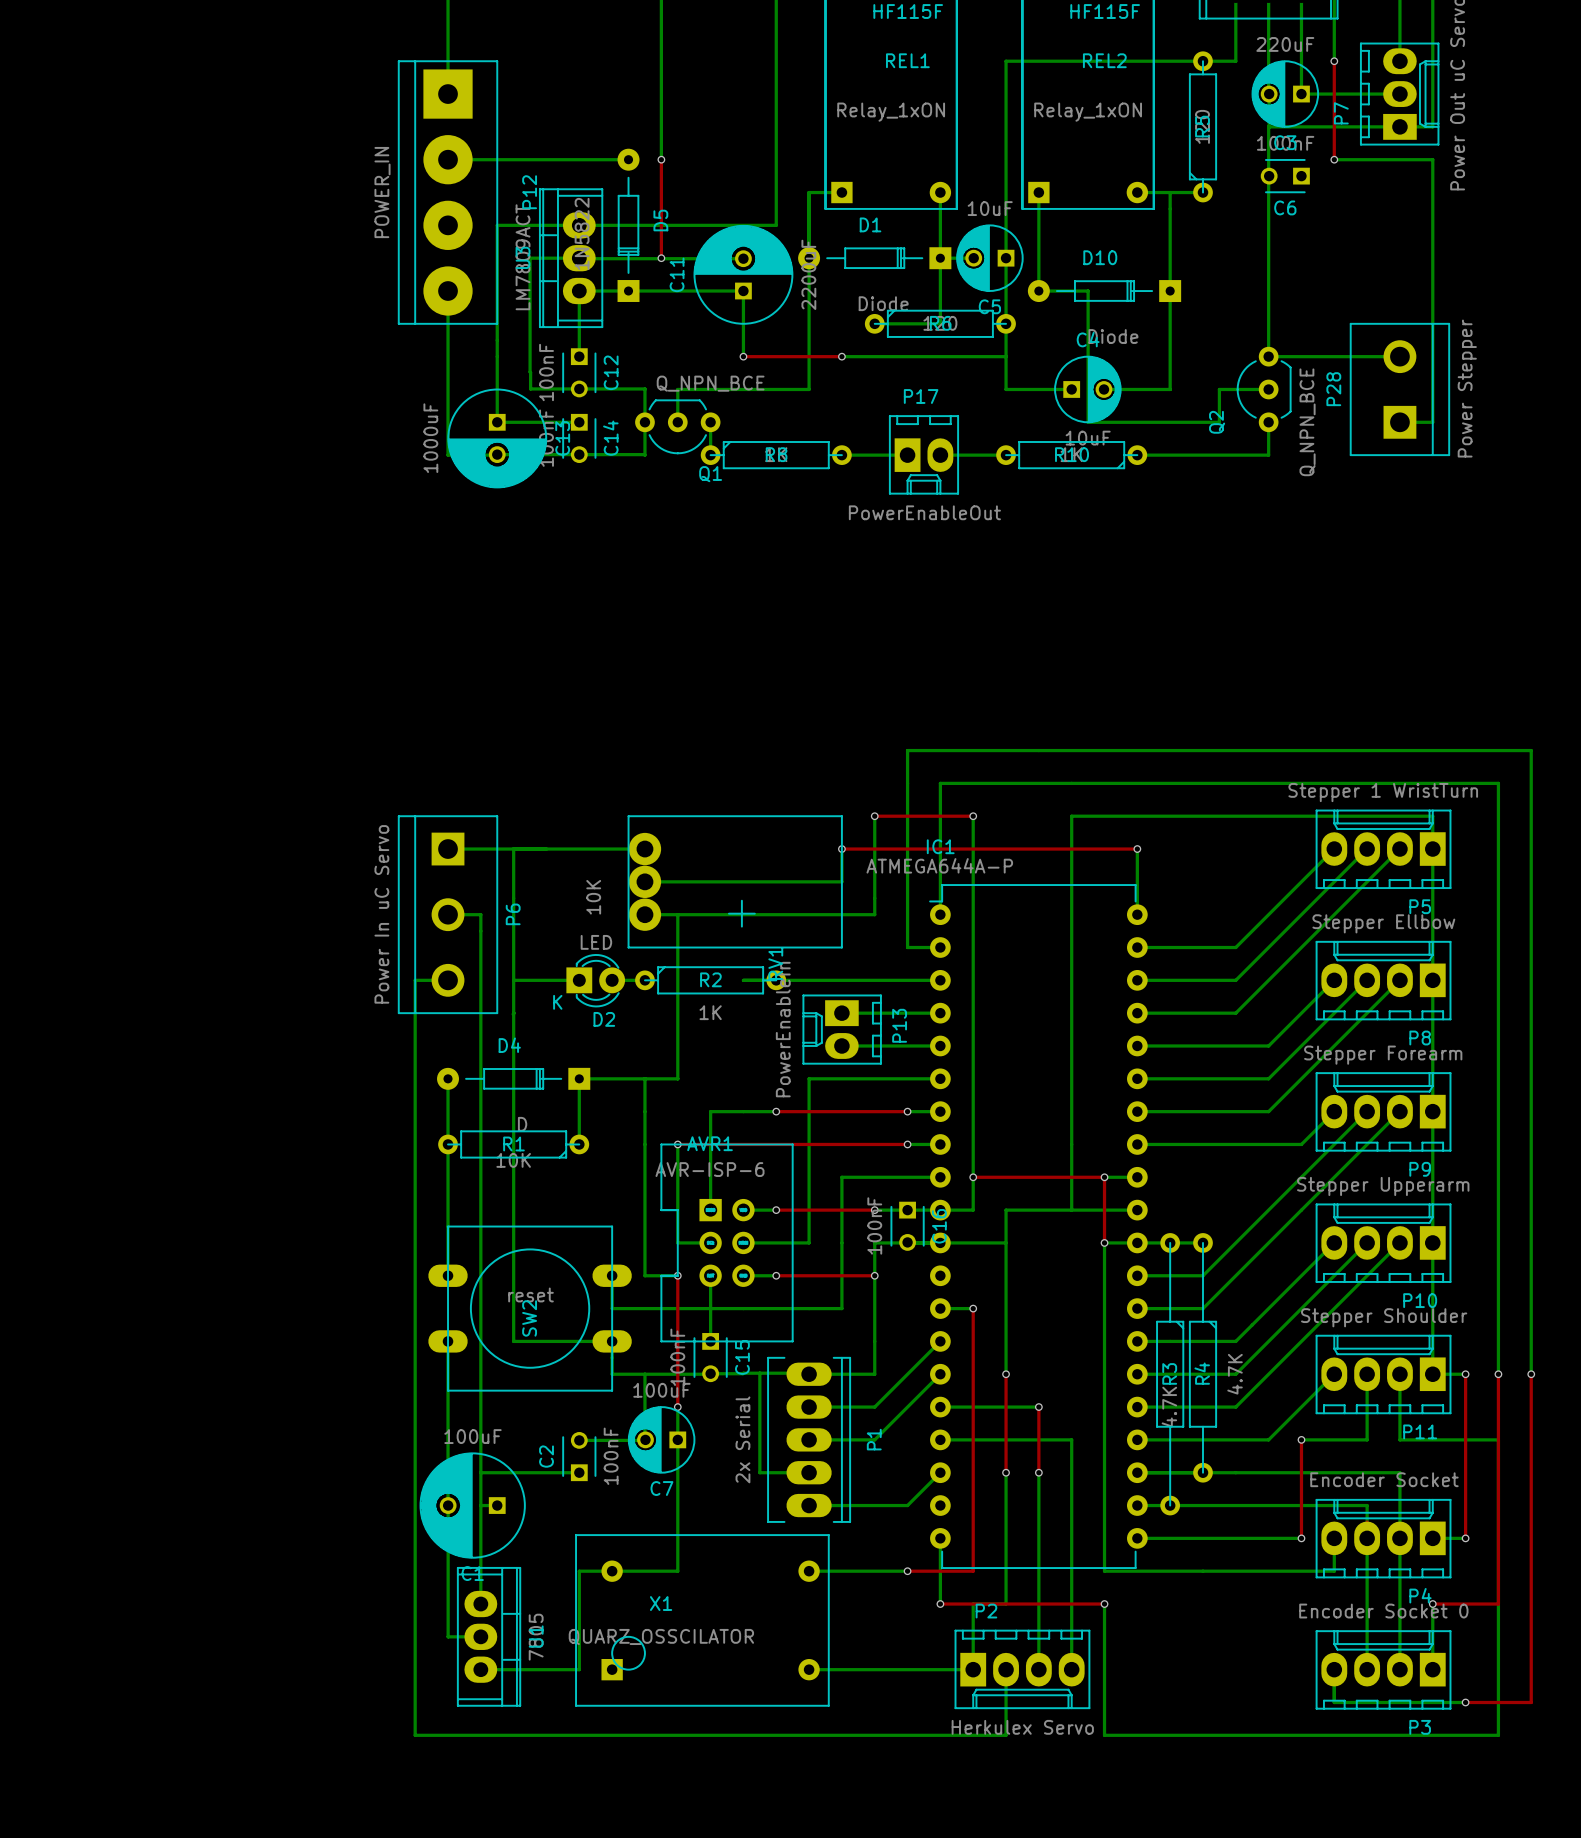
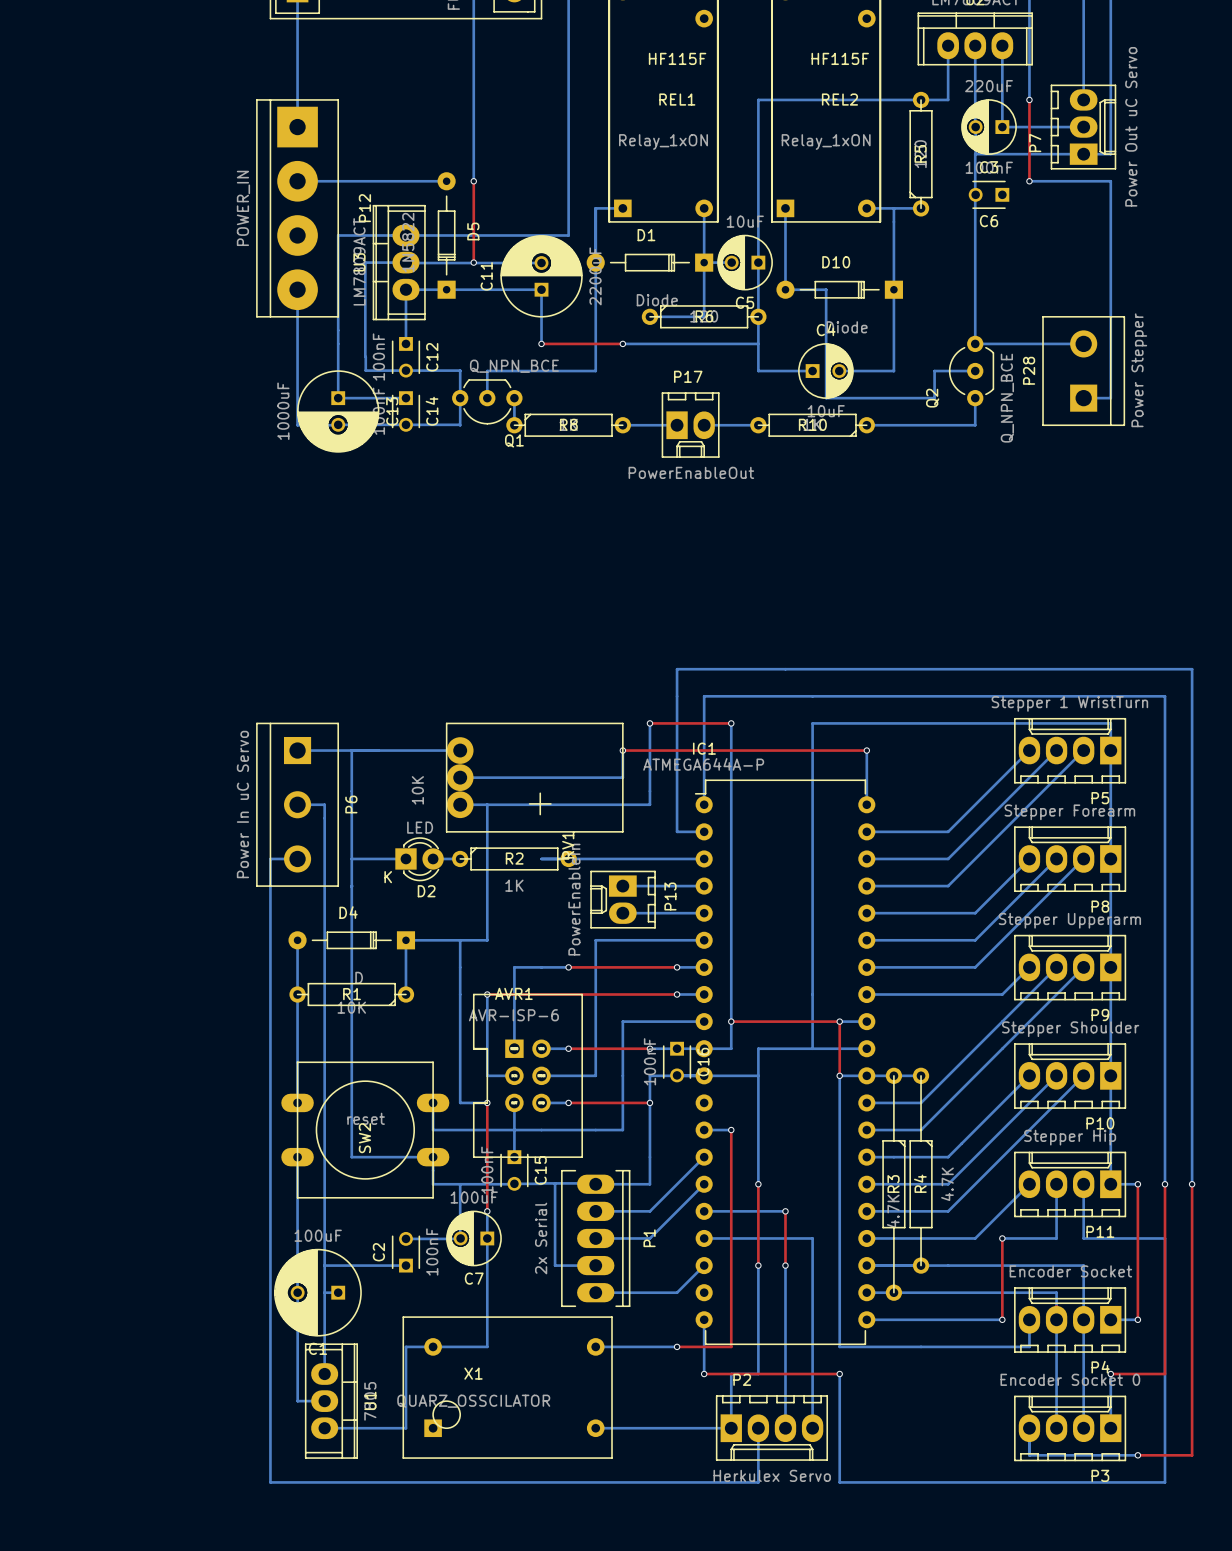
P8 value: Stepper Ellbow (1383, 923) -> Stepper Forearm (1069, 812)
P9 value: Stepper Forearm (1383, 1055) -> Stepper Upperarm (1069, 920)
P10 value: Stepper Upperarm (1383, 1186) -> Stepper Shoulder (1070, 1029)
P11 value: Stepper Shoulder (1384, 1317) -> Stepper Hip (1070, 1137)

